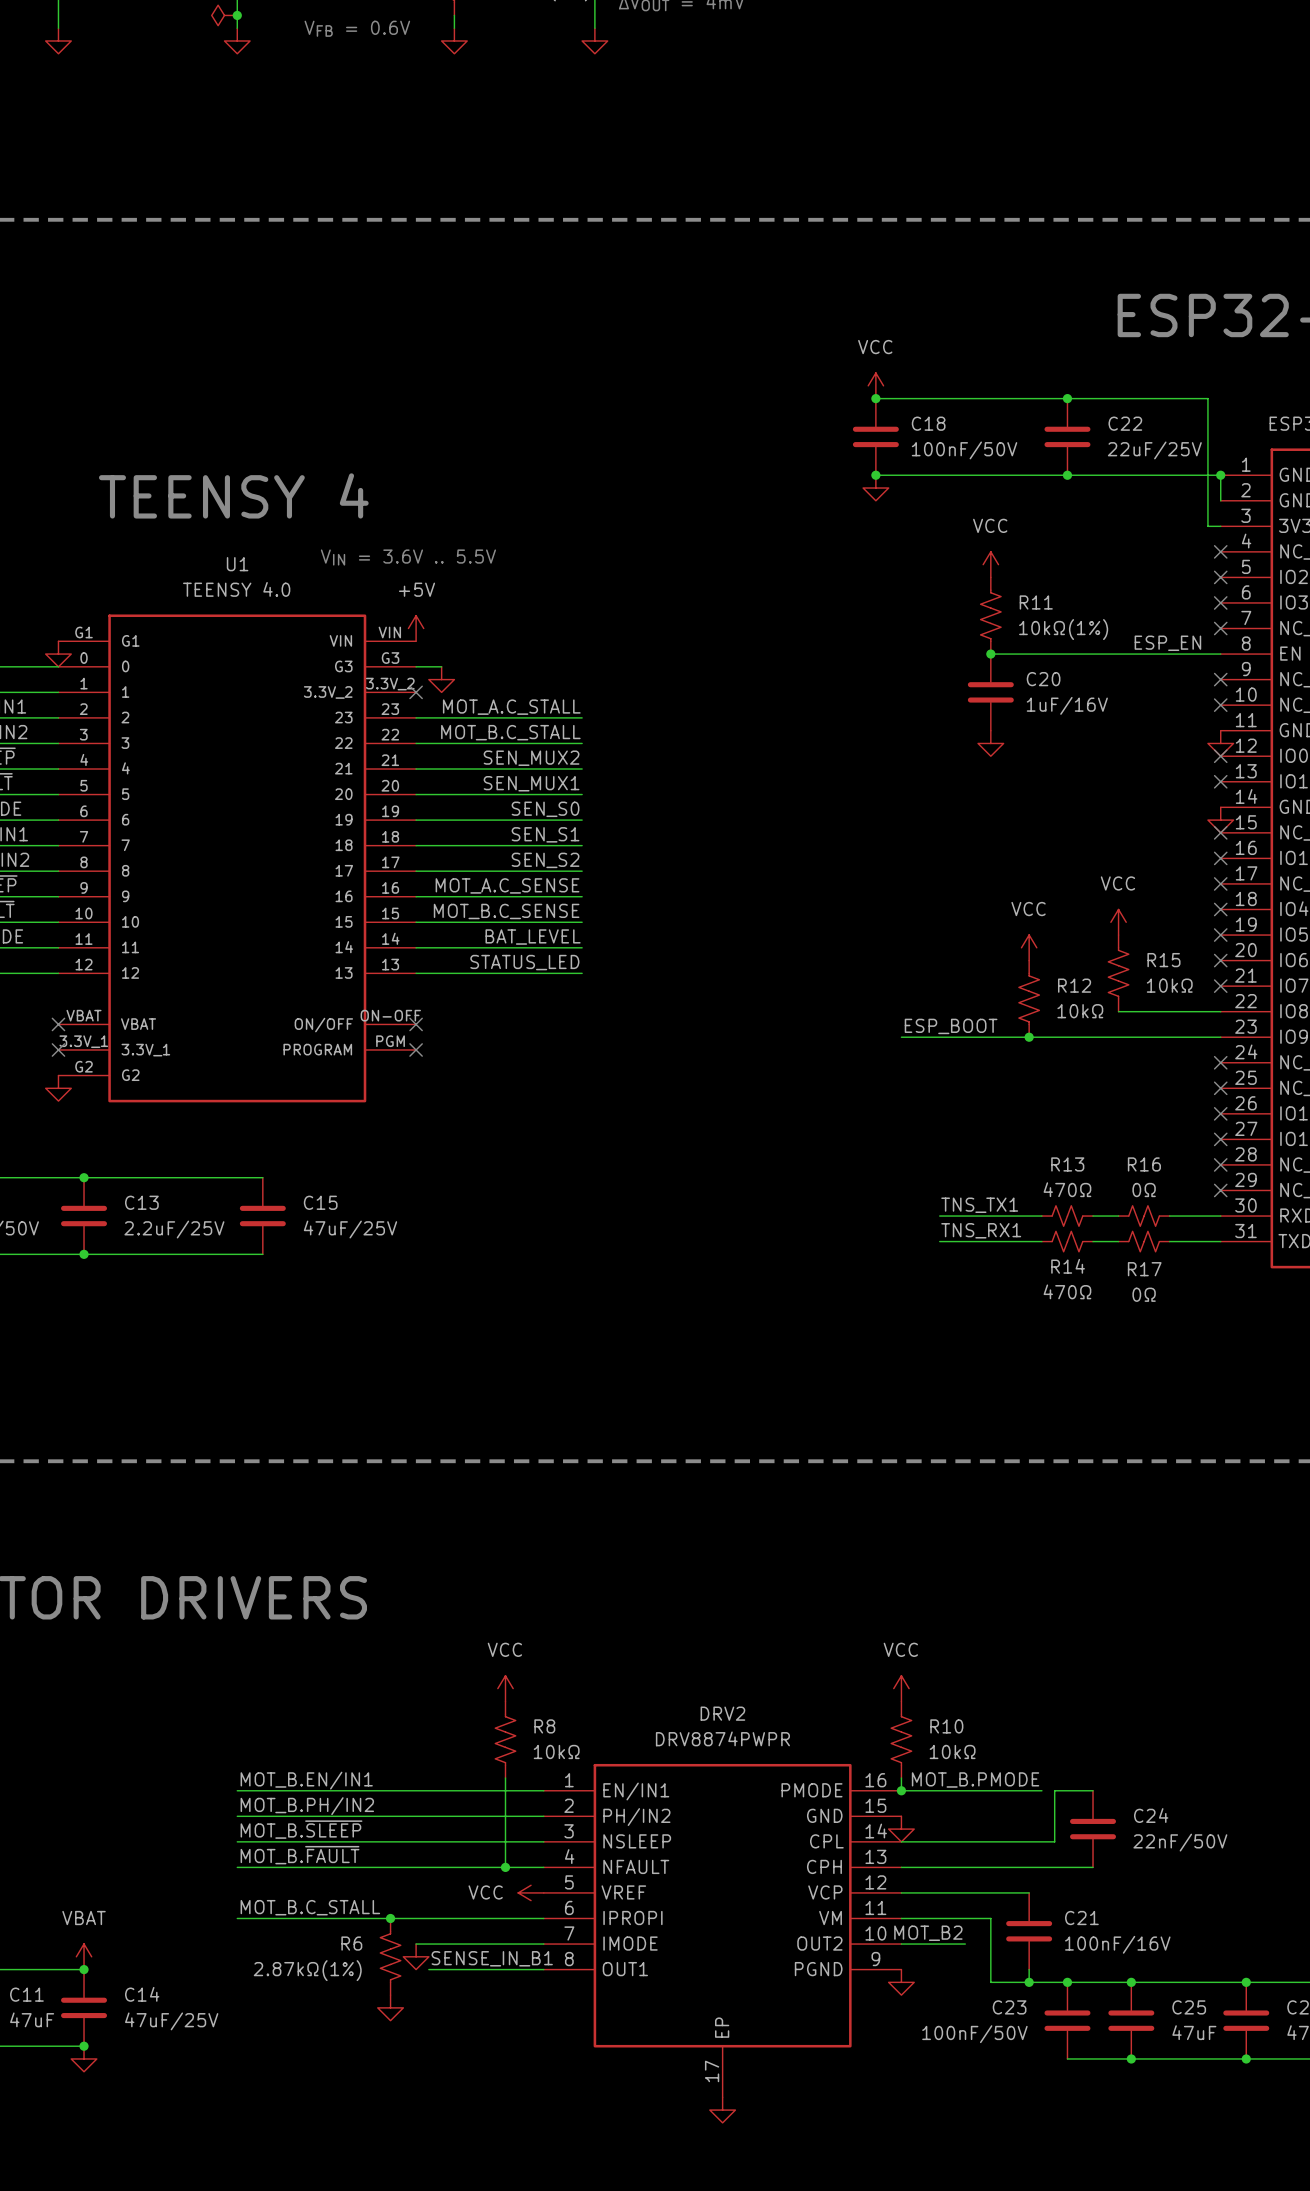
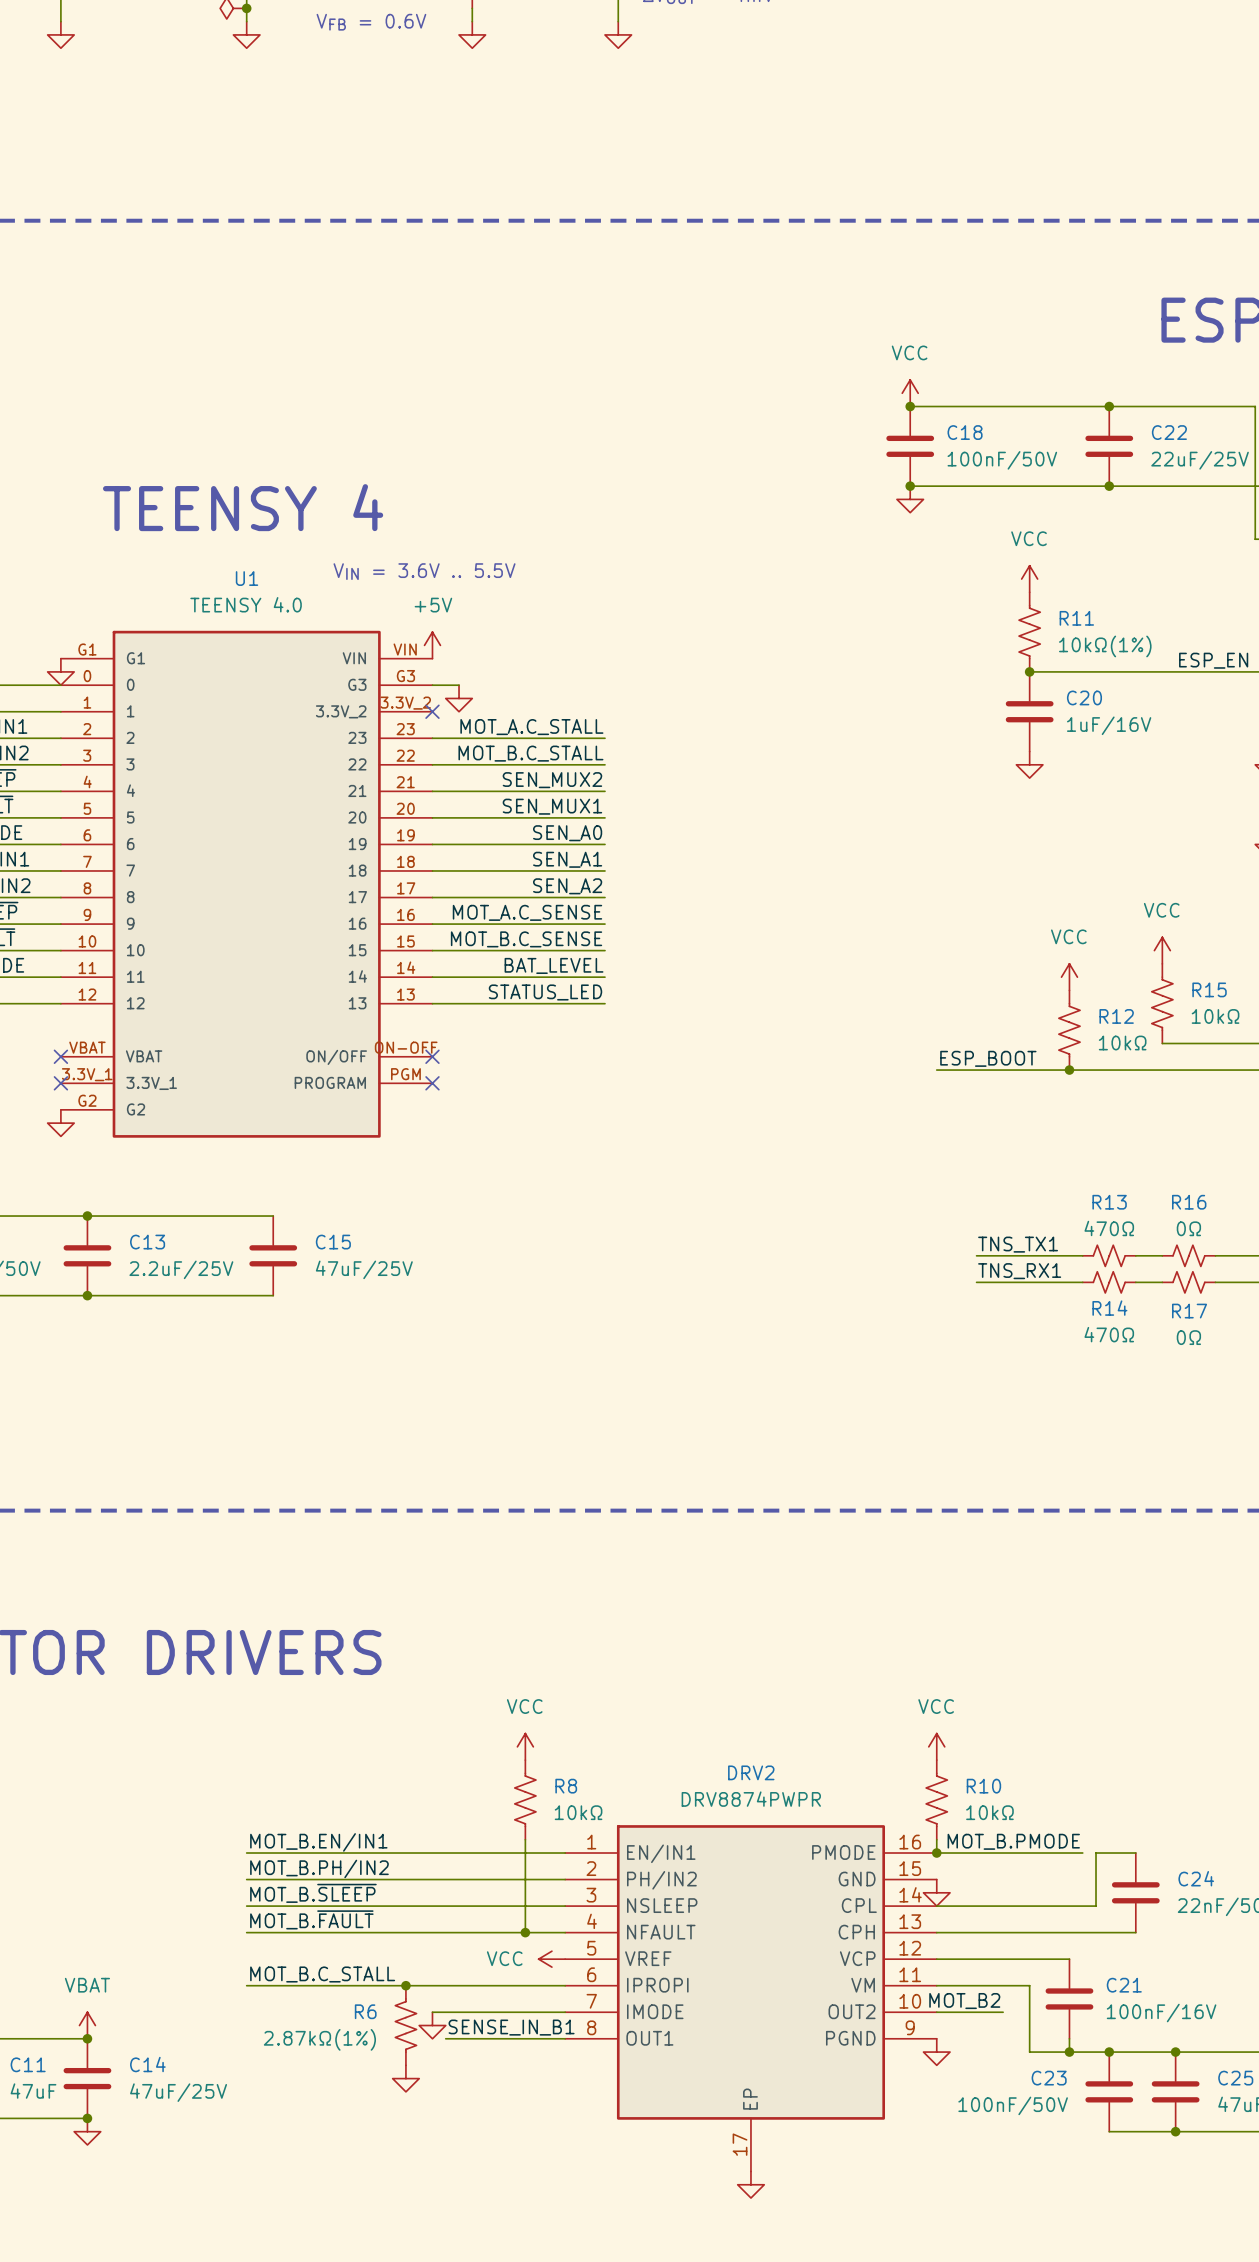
label: SEN_S0 (545, 809) -> SEN_A0 (567, 833)
label: SEN_S1 (545, 834) -> SEN_A1 (567, 859)
label: SEN_S2 (545, 860) -> SEN_A2 (567, 886)

